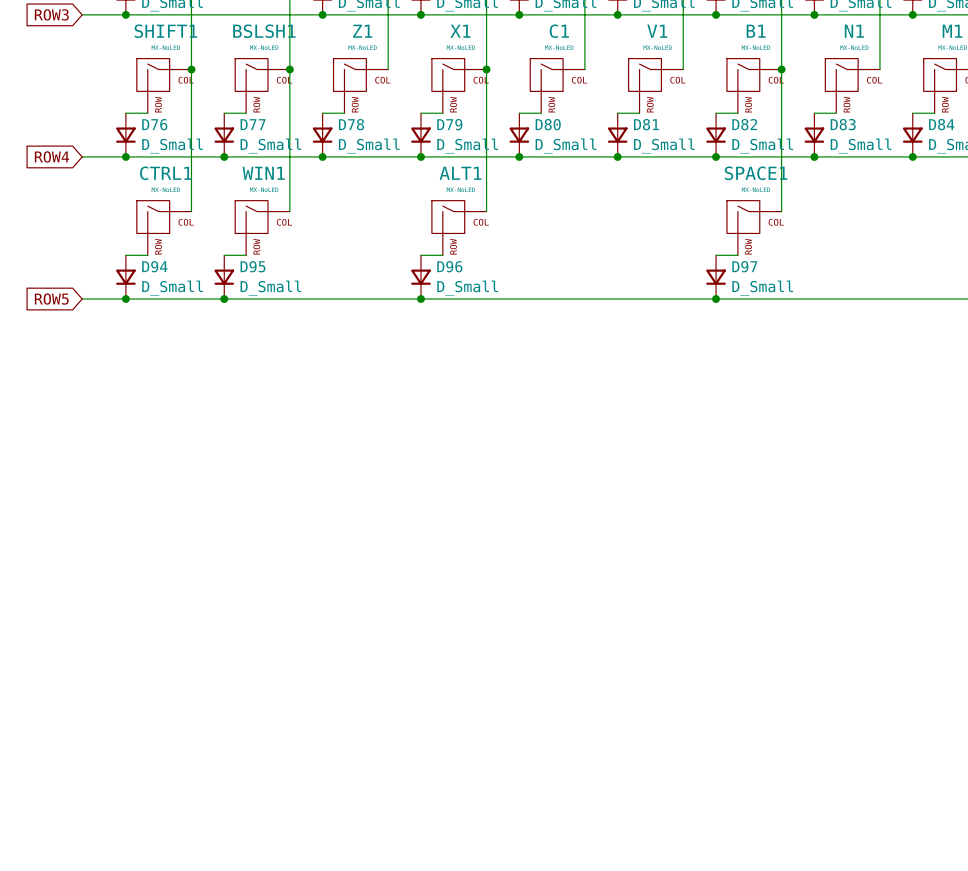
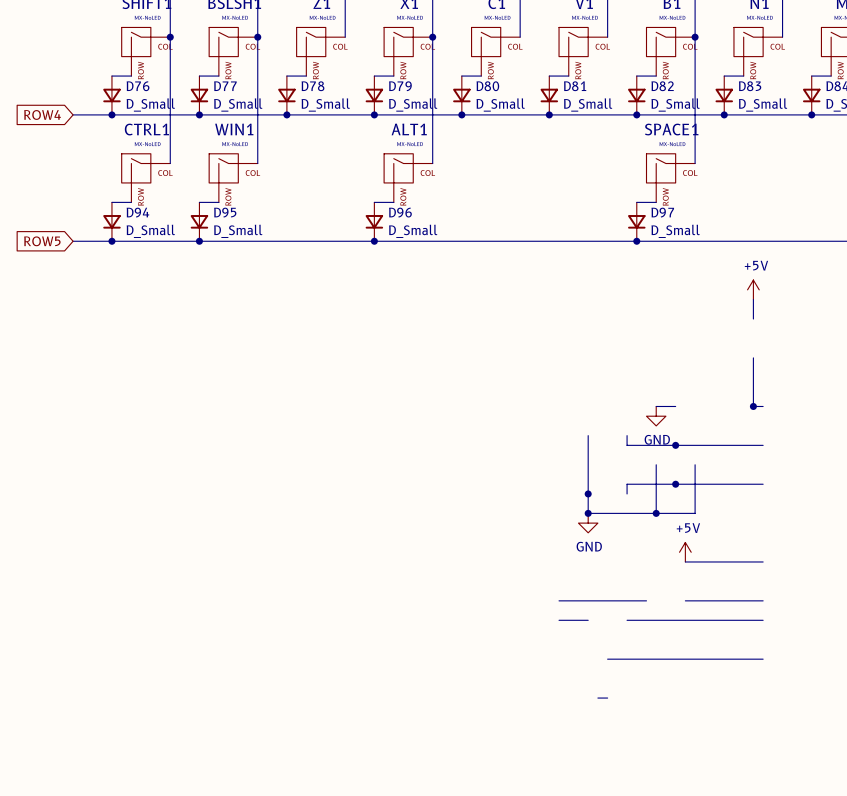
power symbol: none -> +5V (753, 289)
wire: none -> (753, 299) (753, 319)
wire: none -> (753, 357) (753, 406) (763, 406)
wire: none -> (656, 406) (675, 406)
junction: none -> (753, 406)
power symbol: none -> GND (656, 416)
wire: none -> (588, 435) (588, 513) (695, 513) (695, 464)
wire: none -> (627, 435) (627, 445) (763, 445)
junction: none -> (675, 445)
wire: none -> (656, 464) (656, 513)
junction: none -> (675, 484)
wire: none -> (763, 484) (627, 484) (627, 493)
junction: none -> (588, 493)
junction: none -> (588, 513)
junction: none -> (656, 513)
power symbol: none -> GND (588, 523)
power symbol: none -> +5V (685, 552)
wire: none -> (685, 561) (763, 561)
wire: none -> (559, 600) (646, 600)
wire: none -> (685, 600) (763, 600)
wire: none -> (559, 620) (588, 620)
wire: none -> (627, 620) (763, 620)
wire: none -> (607, 659) (763, 659)
wire: none -> (597, 698) (607, 698)

